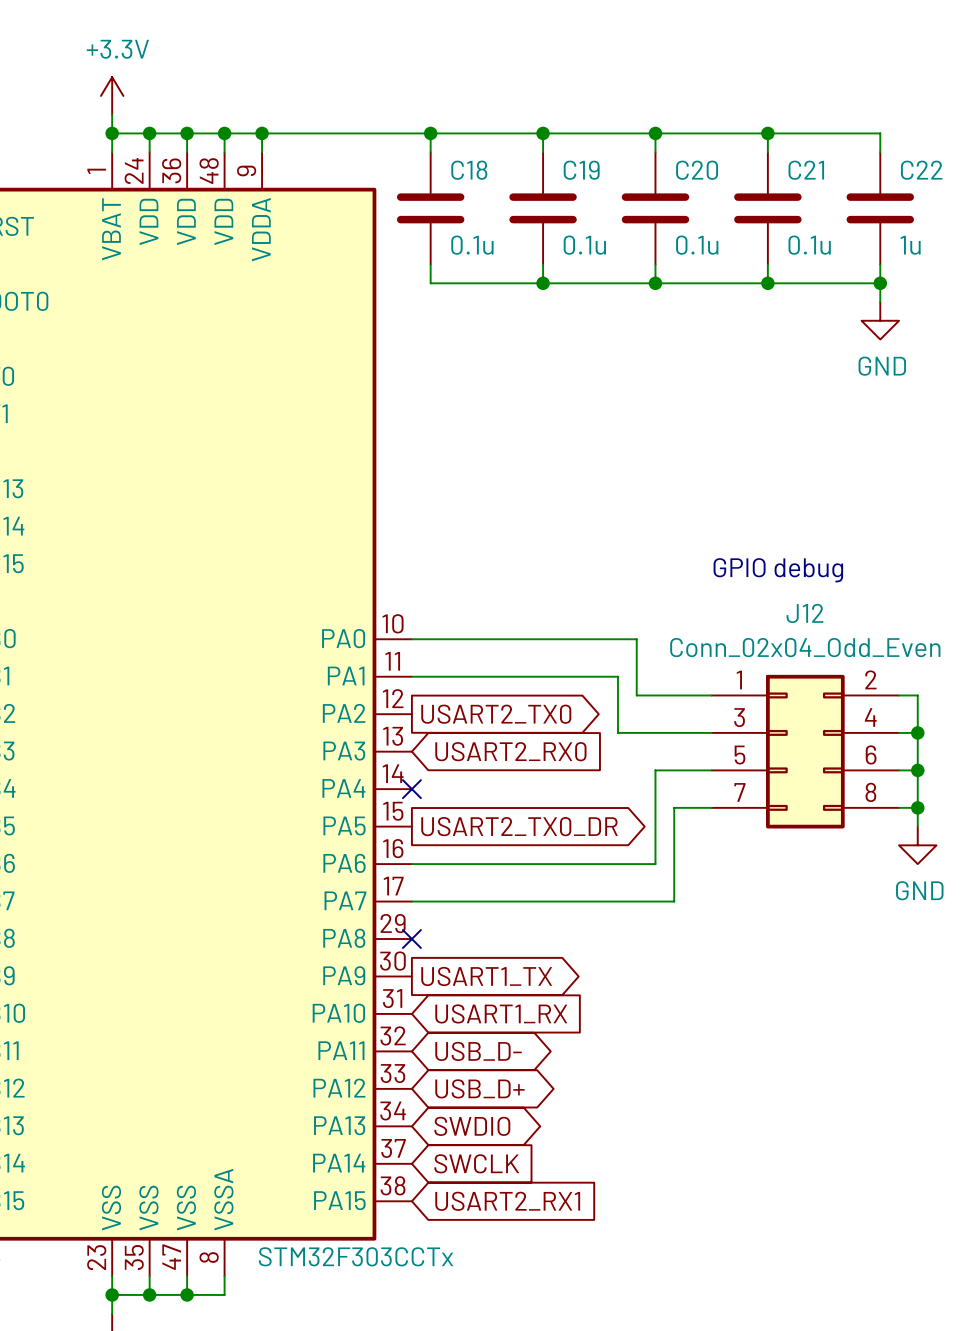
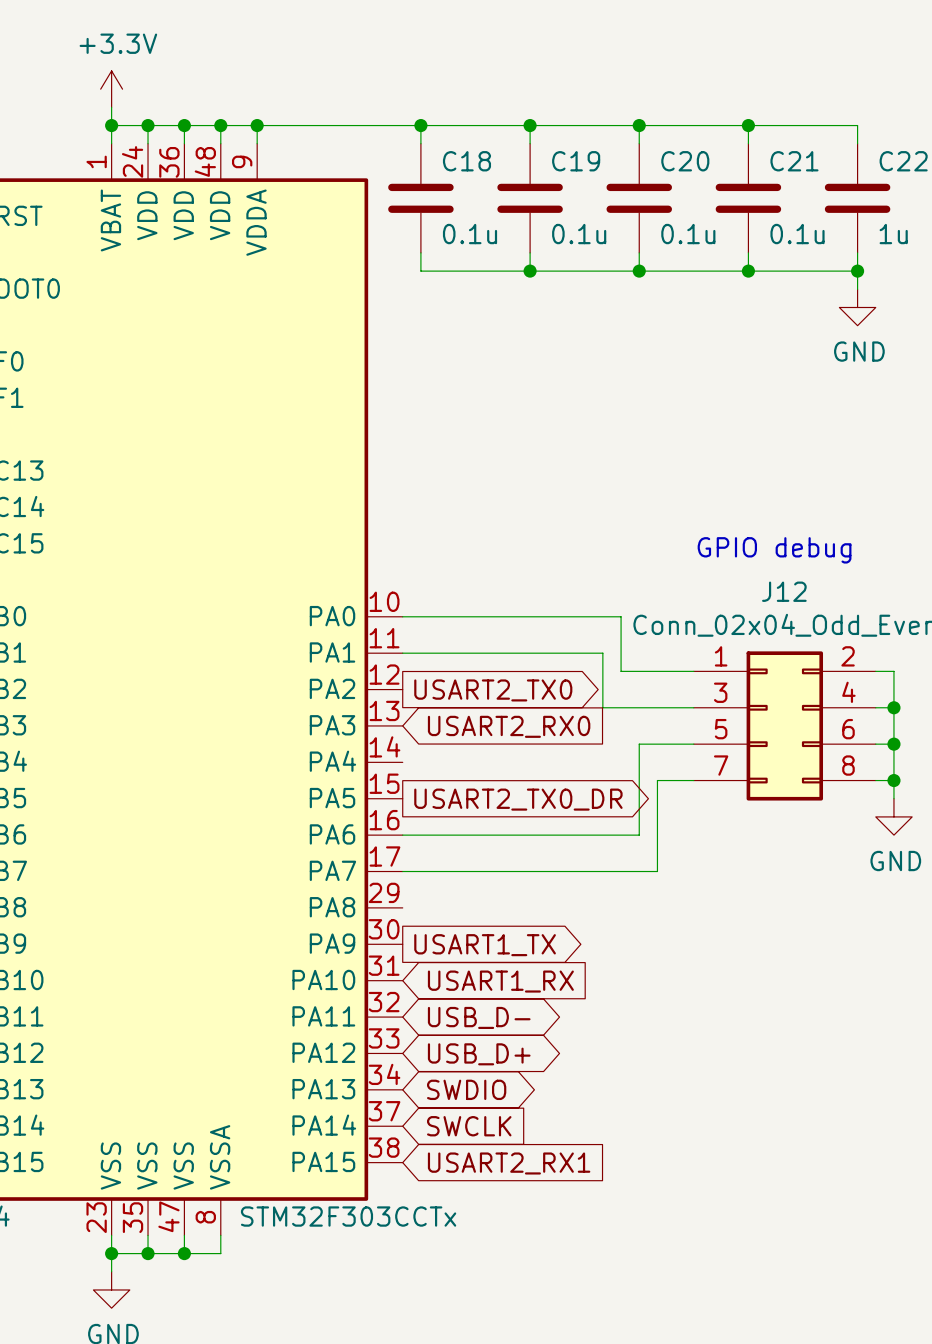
no-connect mark: (411, 789) -> none
no-connect mark: (411, 939) -> none

